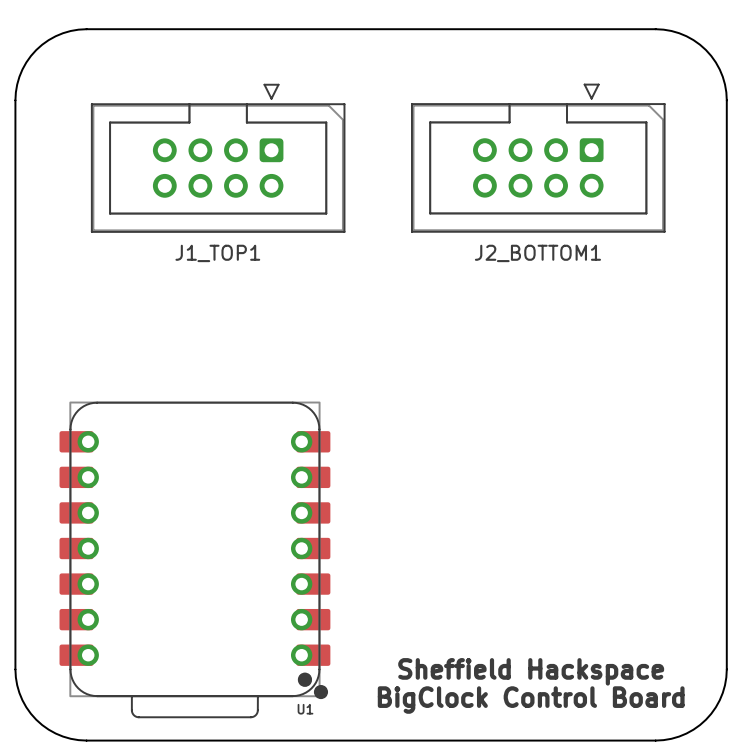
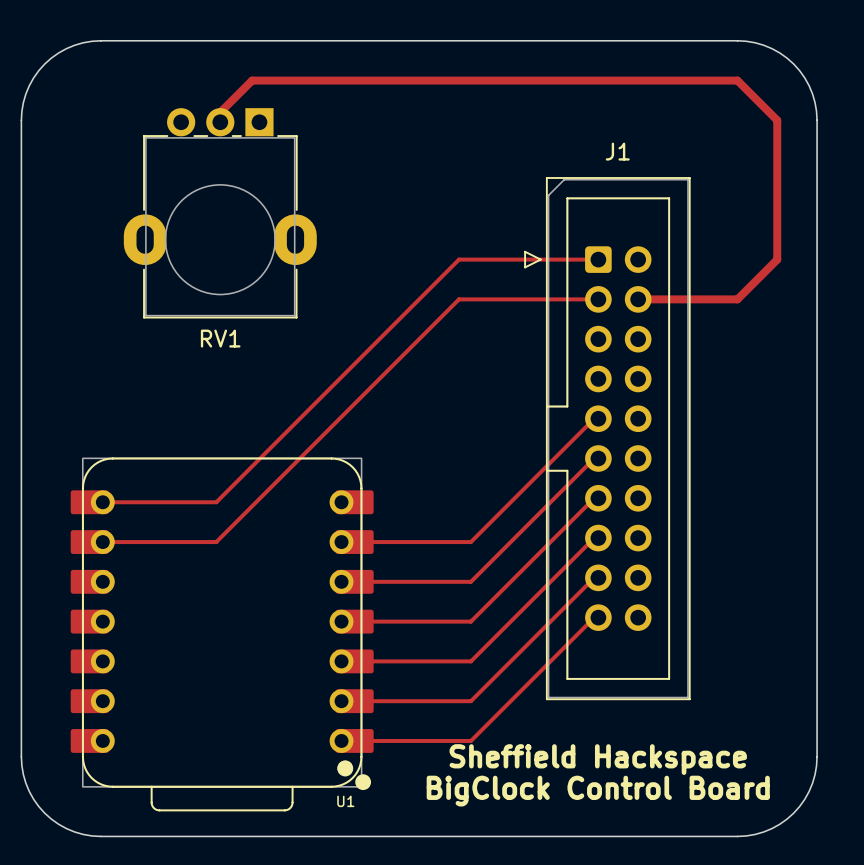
track: none -> (220, 122) (220, 112) (252, 80) (737, 80) (777, 120) (777, 259) (737, 299) (638, 299)
J1_TOP1: (218, 158) -> none
J2_BOTTOM1: (538, 158) -> none
RV1: none -> (220, 213)
track: none -> (600, 259) (459, 259) (216, 502) (100, 502)
track: none -> (598, 299) (459, 299) (216, 542) (104, 542)
track: none -> (594, 418) (470, 542) (339, 542)
J1: none -> (607, 438)
track: none -> (594, 458) (470, 581) (339, 581)
track: none -> (594, 498) (470, 621) (339, 621)
track: none -> (594, 538) (470, 661) (339, 661)
track: none -> (594, 577) (470, 701) (339, 701)
track: none -> (594, 617) (470, 740) (339, 740)

